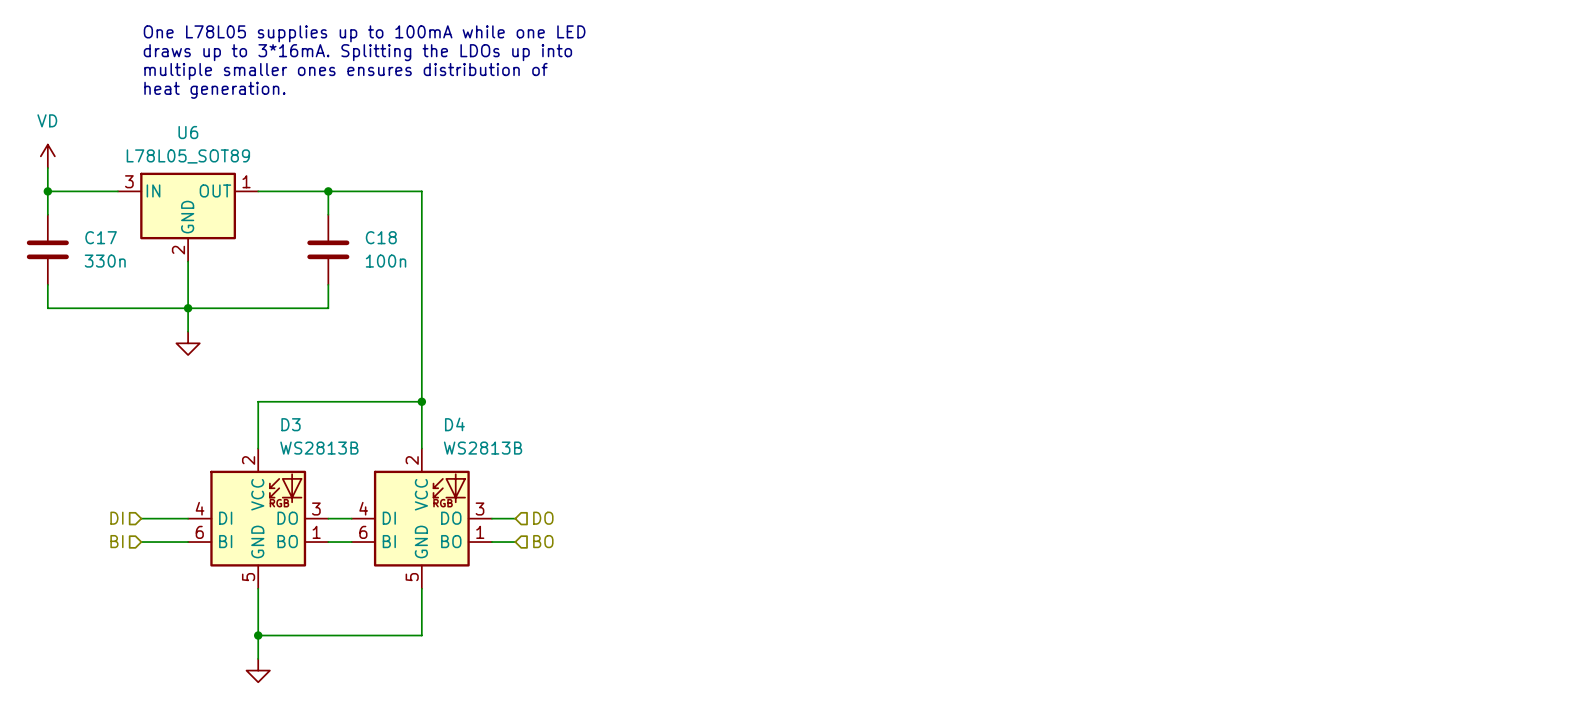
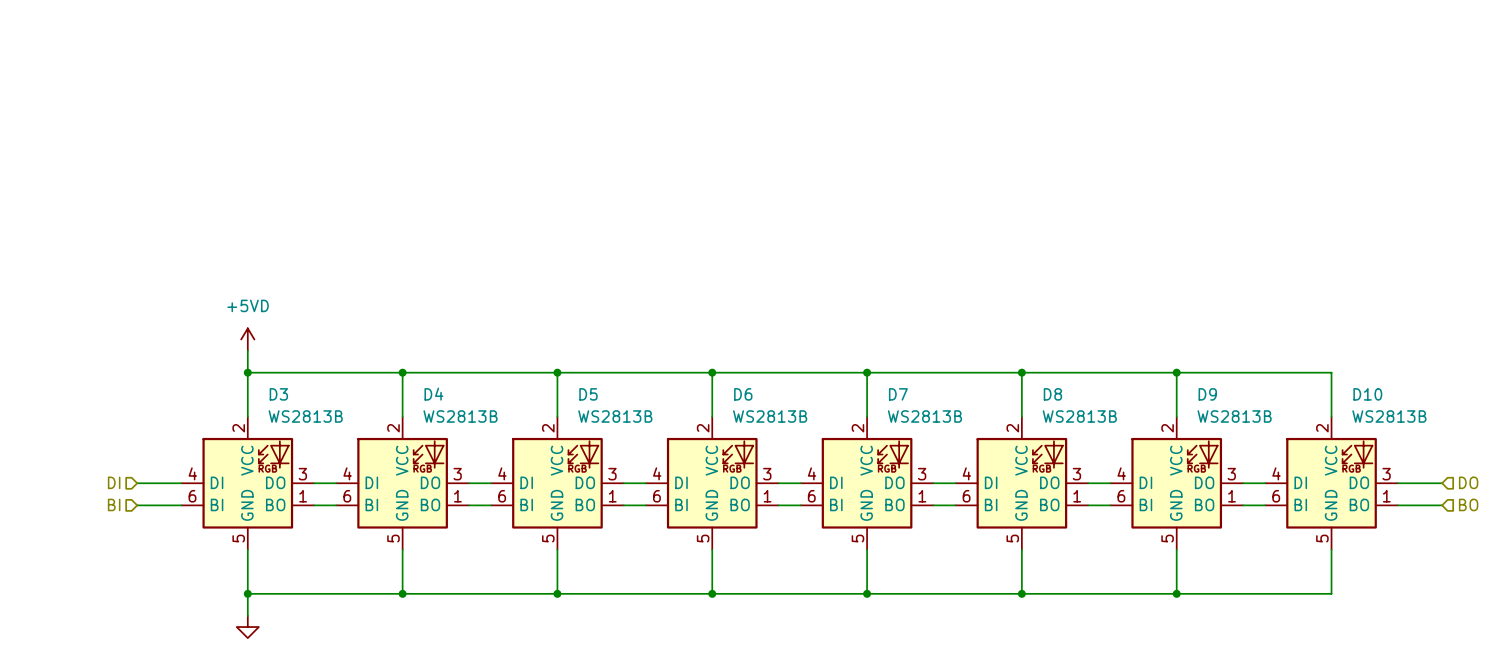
text: One L78L05 supplies up to 100mA while one LED (364, 33) -> none
text: draws up to 3*16mA. Splitting the LDOs up into (357, 52) -> none
text: multiple smaller ones ensures distribution of (345, 71) -> none
text: heat generation. (214, 90) -> none
power symbol: VD (47, 156) -> none
wire: (47, 168) (47, 214) -> none
wire: (47, 191) (117, 191) -> none
junction: (47, 191) -> none
wire: (258, 191) (421, 191) (421, 401) -> (1331, 416) (1331, 372) (402, 372)
wire: (328, 191) (328, 214) -> (247, 350) (247, 372)
junction: (328, 191) -> none
U6: L78L05_SOT89 (188, 217) -> none
C17: 330n (47, 249) -> none
C18: 100n (328, 249) -> none
wire: (188, 261) (188, 331) -> none
wire: (47, 284) (47, 308) (328, 308) (328, 284) -> none
junction: (188, 308) -> none
power symbol: (188, 343) -> none
power symbol: none -> +5VD (247, 339)
junction: none -> (247, 372)
wire: none -> (557, 372) (557, 416)
junction: none -> (557, 372)
wire: none -> (712, 372) (712, 416)
junction: none -> (712, 372)
wire: none -> (867, 372) (867, 416)
junction: none -> (867, 372)
wire: none -> (1021, 372) (1021, 416)
junction: none -> (1021, 372)
wire: none -> (1176, 372) (1176, 416)
junction: none -> (1176, 372)
hierarchical label: DO (543, 518) -> none
D5: none -> WS2813B (557, 483)
wire: none -> (623, 483) (645, 483)
D6: none -> WS2813B (712, 483)
wire: none -> (778, 483) (800, 483)
D7: none -> WS2813B (867, 483)
wire: none -> (933, 483) (955, 483)
D8: none -> WS2813B (1021, 483)
wire: none -> (1088, 483) (1110, 483)
D9: none -> WS2813B (1176, 483)
wire: none -> (1243, 483) (1265, 483)
D10: none -> WS2813B (1331, 483)
wire: none -> (1397, 483) (1442, 483)
hierarchical label: none -> DO (1468, 482)
hierarchical label: BO (543, 541) -> none
hierarchical label: none -> BO (1468, 504)
wire: none -> (623, 505) (645, 505)
wire: none -> (778, 505) (800, 505)
wire: none -> (933, 505) (955, 505)
wire: none -> (1088, 505) (1110, 505)
wire: none -> (1243, 505) (1265, 505)
wire: none -> (1397, 505) (1442, 505)
wire: none -> (557, 549) (557, 593)
wire: none -> (712, 549) (712, 593)
wire: none -> (867, 549) (867, 593)
wire: none -> (1021, 549) (1021, 593)
wire: none -> (1176, 549) (1176, 593)
wire: none -> (1331, 549) (1331, 593) (402, 593)
junction: none -> (402, 593)
junction: none -> (557, 593)
junction: none -> (712, 593)
junction: none -> (867, 593)
junction: none -> (1021, 593)
junction: none -> (1176, 593)

